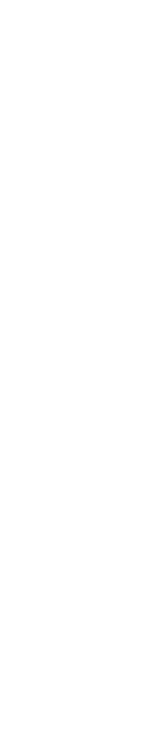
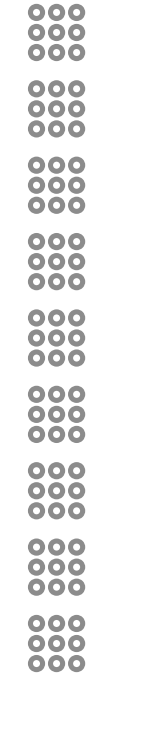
part: none -> (56, 32)
part: none -> (56, 108)
part: none -> (56, 185)
part: none -> (56, 261)
part: none -> (56, 338)
part: none -> (56, 414)
part: none -> (56, 490)
part: none -> (56, 567)
part: none -> (56, 643)

